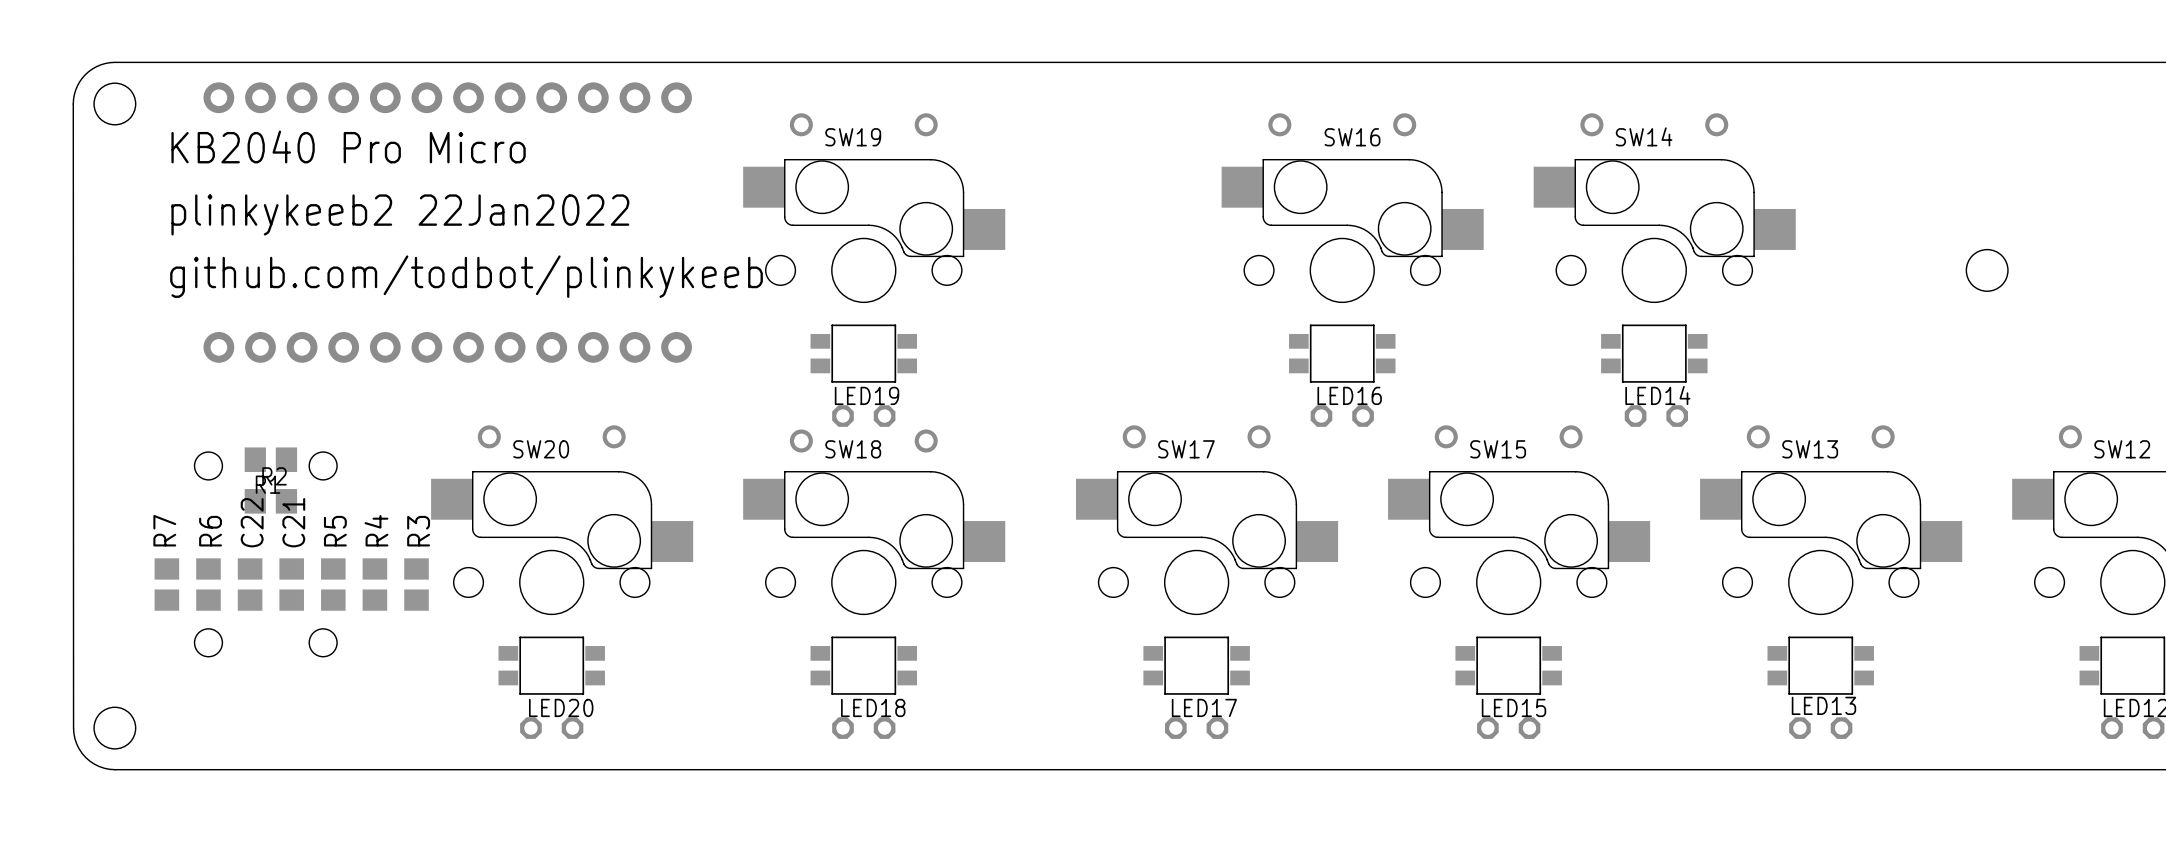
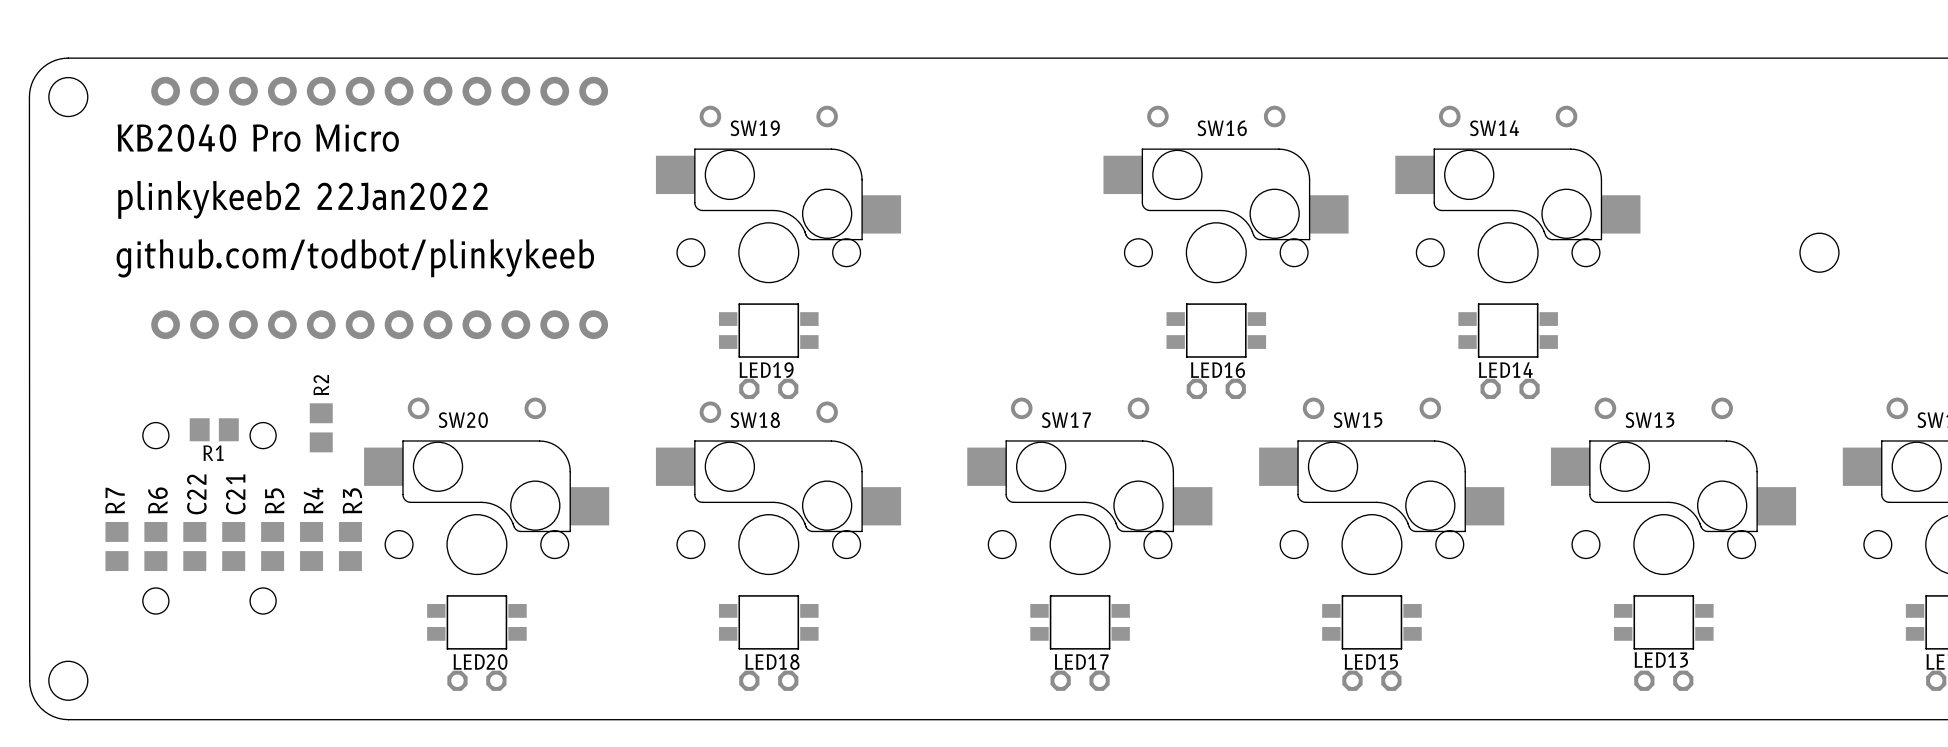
R2 rotation: 0° (270, 501) -> 90° clockwise (321, 427)
R2 position: (270, 501) -> (321, 427)

